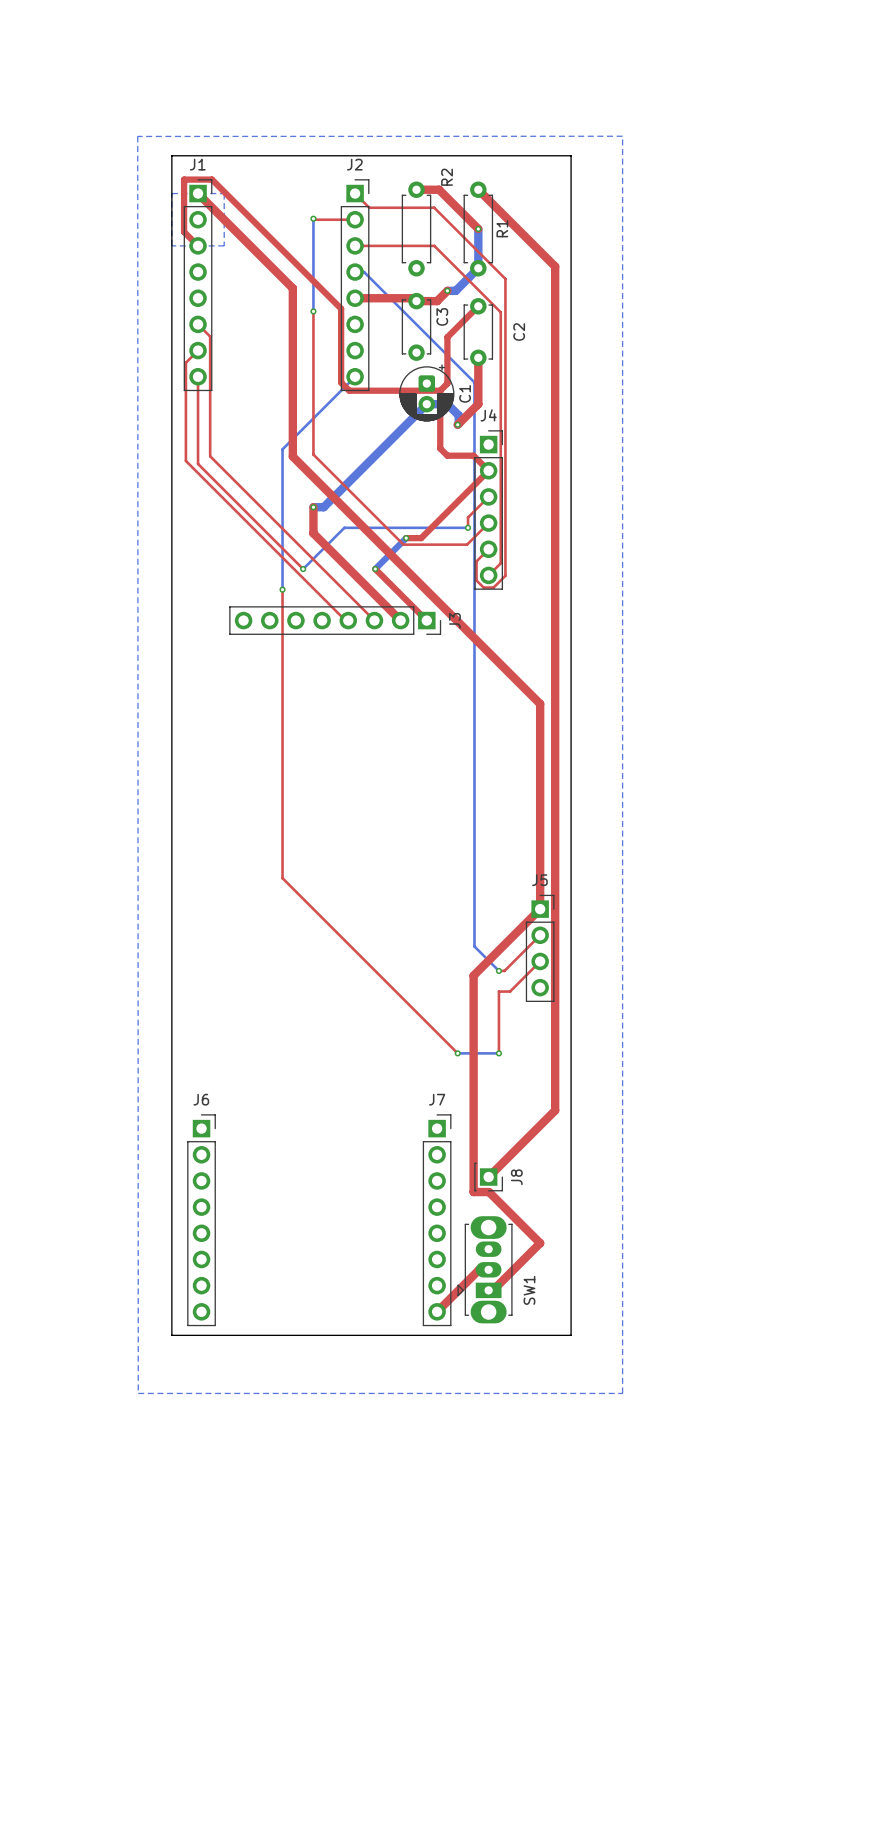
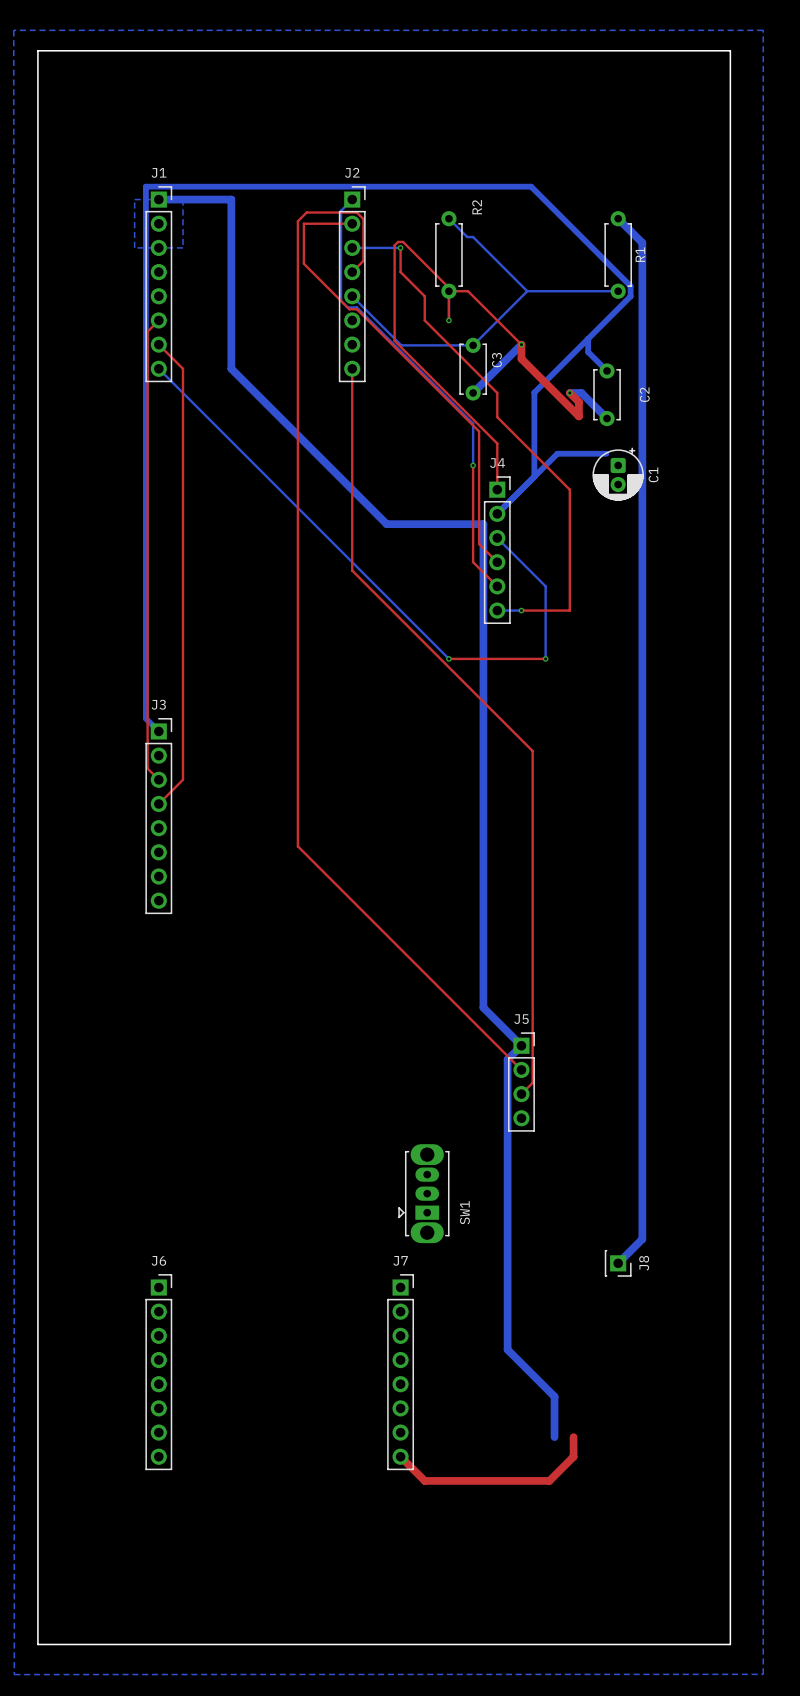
bottom zone outline: none -> (13, 30) (14, 1674) (763, 1674) (763, 30) (13, 30)
board edge: none -> (37, 50) (730, 50) (730, 1644) (37, 1644) (37, 50)
bottom zone outline: (622, 136) (622, 1393) (138, 1393) (137, 136) (622, 136) -> none
board edge: (171, 155) (571, 155) (571, 1335) (171, 1335) (171, 155) -> none
top track: (416, 189) (439, 189) (478, 228) -> none
top track: (478, 189) (555, 266) (555, 1110) (488, 1177) -> none
top track: (198, 193) (292, 288) (292, 456) (540, 703) (540, 909) (473, 975) (473, 1192) (489, 1192) (540, 1243) (492, 1290) (488, 1290) -> none
bottom track: none -> (158, 199) (231, 199) (231, 368) (386, 524) (483, 524) (483, 1007) (521, 1045) (507, 1059) (507, 1349) (554, 1396) (554, 1437)
top track: (355, 193) (369, 207) (434, 207) (505, 278) (505, 575) (493, 587) (483, 587) (476, 580) (476, 561) (488, 549) -> none
bottom track: none -> (448, 218) (467, 237) (473, 237) (527, 291)
bottom track: none -> (618, 218) (642, 242) (642, 1239) (618, 1263)
top track: (313, 218) (355, 219) -> none
bottom track: (313, 218) (313, 311) -> none
via: (313, 218) -> none
top track: none -> (352, 223) (303, 223) (303, 263) (349, 309) (356, 309) (479, 431) (479, 544) (497, 562)
R2 position: (416, 228) -> (448, 254)
bottom track: (478, 228) (478, 268) (455, 290) (447, 290) -> none
R1 position: (478, 228) -> (618, 254)
via: (478, 228) -> none
top track: (198, 245) (184, 231) (184, 179) (212, 179) (341, 308) (341, 382) (349, 390) (440, 390) -> none
top track: (355, 245) (434, 245) (500, 312) (500, 563) (488, 575) -> none
bottom track: none -> (352, 247) (400, 247)
top track: none -> (400, 247) (400, 272) (424, 296) (424, 320) (497, 392) (497, 417) (569, 489) (569, 610) (521, 610)
via: none -> (400, 247)
bottom track: (355, 272) (364, 272) (395, 303) -> (352, 199) (341, 210) (341, 300)
top track: none -> (352, 272) (363, 260) (363, 219) (356, 212) (306, 212) (297, 221) (297, 846) (521, 1069)
J2 position: (355, 285) -> (352, 284)
top track: (447, 290) (437, 301) (416, 301) (413, 298) (355, 298) -> none
via: (447, 290) -> none
top track: none -> (448, 291) (468, 291) (521, 344) (521, 358) (578, 416) (578, 402) (569, 392)
bottom track: none -> (527, 291) (618, 291)
bottom track: none -> (527, 291) (473, 345) (401, 345) (352, 296)
top track: (478, 306) (447, 337) (447, 383) (440, 390) -> none
bottom track: (402, 310) (474, 382) (474, 946) (498, 970) -> (347, 307) (356, 307) (473, 423) (473, 465)
top track: (313, 311) (313, 454) (403, 544) (467, 544) (488, 523) -> none
via: (313, 311) -> none
top track: (198, 324) (210, 336) (210, 456) (374, 620) -> none
top track: none -> (448, 320) (448, 287) (403, 241) (398, 241) (394, 245) (394, 340) (497, 443) (497, 489)
via: none -> (448, 320)
C3 position: (416, 326) -> (473, 369)
C2 position: (478, 332) -> (607, 394)
bottom track: none -> (588, 338) (588, 352) (607, 370)
top track: (198, 350) (185, 362) -> (158, 320) (147, 331) (147, 355)
top track: none -> (158, 344) (183, 368) (183, 779) (158, 803)
bottom track: none -> (521, 344) (473, 392)
via: none -> (521, 344)
top track: (478, 357) (478, 404) (457, 424) -> none
top track: (198, 376) (198, 463) (303, 569) -> none
bottom track: none -> (158, 368) (448, 658)
bottom track: (355, 376) (282, 449) (282, 589) -> none
top track: none -> (352, 368) (352, 570) (532, 751) (532, 1082) (521, 1094)
top track: (440, 390) (440, 448) (447, 455) (473, 455) (488, 470) (421, 538) (406, 538) -> none
C1 position: (426, 392) -> (618, 474)
bottom track: none -> (569, 392) (581, 392) (607, 418)
via: none -> (569, 392)
bottom track: (457, 424) (458, 415) (447, 404) (426, 404) (323, 507) (313, 507) -> none
via: (457, 424) -> none
top track: (185, 460) (345, 620) (348, 620) -> (147, 446) (147, 768) (158, 779)
bottom track: none -> (606, 453) (557, 453) (497, 513)
top track: none -> (473, 465) (473, 562) (497, 586)
via: none -> (473, 465)
bottom track: none -> (534, 476) (534, 392) (630, 296) (630, 286) (531, 186) (145, 186) (145, 718) (158, 731)
top track: (488, 496) (468, 517) (468, 527) -> none
top track: (313, 507) (313, 533) (400, 620) -> none
via: (313, 507) -> none
J4 position: (488, 510) -> (497, 550)
bottom track: (468, 527) (344, 527) (303, 569) -> none
via: (468, 527) -> none
bottom track: (406, 538) (375, 569) -> none
via: (406, 538) -> none
bottom track: none -> (497, 538) (545, 586) (545, 658)
via: (303, 569) -> none
top track: (375, 569) (426, 620) -> none
via: (375, 569) -> none
top track: (282, 589) (282, 878) (457, 1053) -> none
via: (282, 589) -> none
J3 rotation: 0° (335, 620) -> 90° counterclockwise (158, 816)
J3 position: (335, 620) -> (158, 816)
bottom track: none -> (497, 610) (521, 610)
via: none -> (521, 610)
top track: none -> (448, 658) (545, 658)
via: none -> (448, 658)
via: none -> (545, 658)
top track: (540, 935) (504, 970) (498, 970) -> none
J5 position: (540, 948) -> (521, 1082)
top track: (540, 961) (510, 991) (498, 991) (498, 1053) -> none
via: (498, 970) -> none
bottom track: (457, 1053) (498, 1053) -> none
via: (457, 1053) -> none
via: (498, 1053) -> none
J8 position: (488, 1177) -> (618, 1263)
J6 position: (201, 1220) -> (158, 1372)
J7 position: (437, 1220) -> (400, 1372)
top track: (488, 1269) (479, 1269) (437, 1311) -> none
top track: none -> (573, 1437) (573, 1456) (549, 1480) (424, 1480) (400, 1456)

